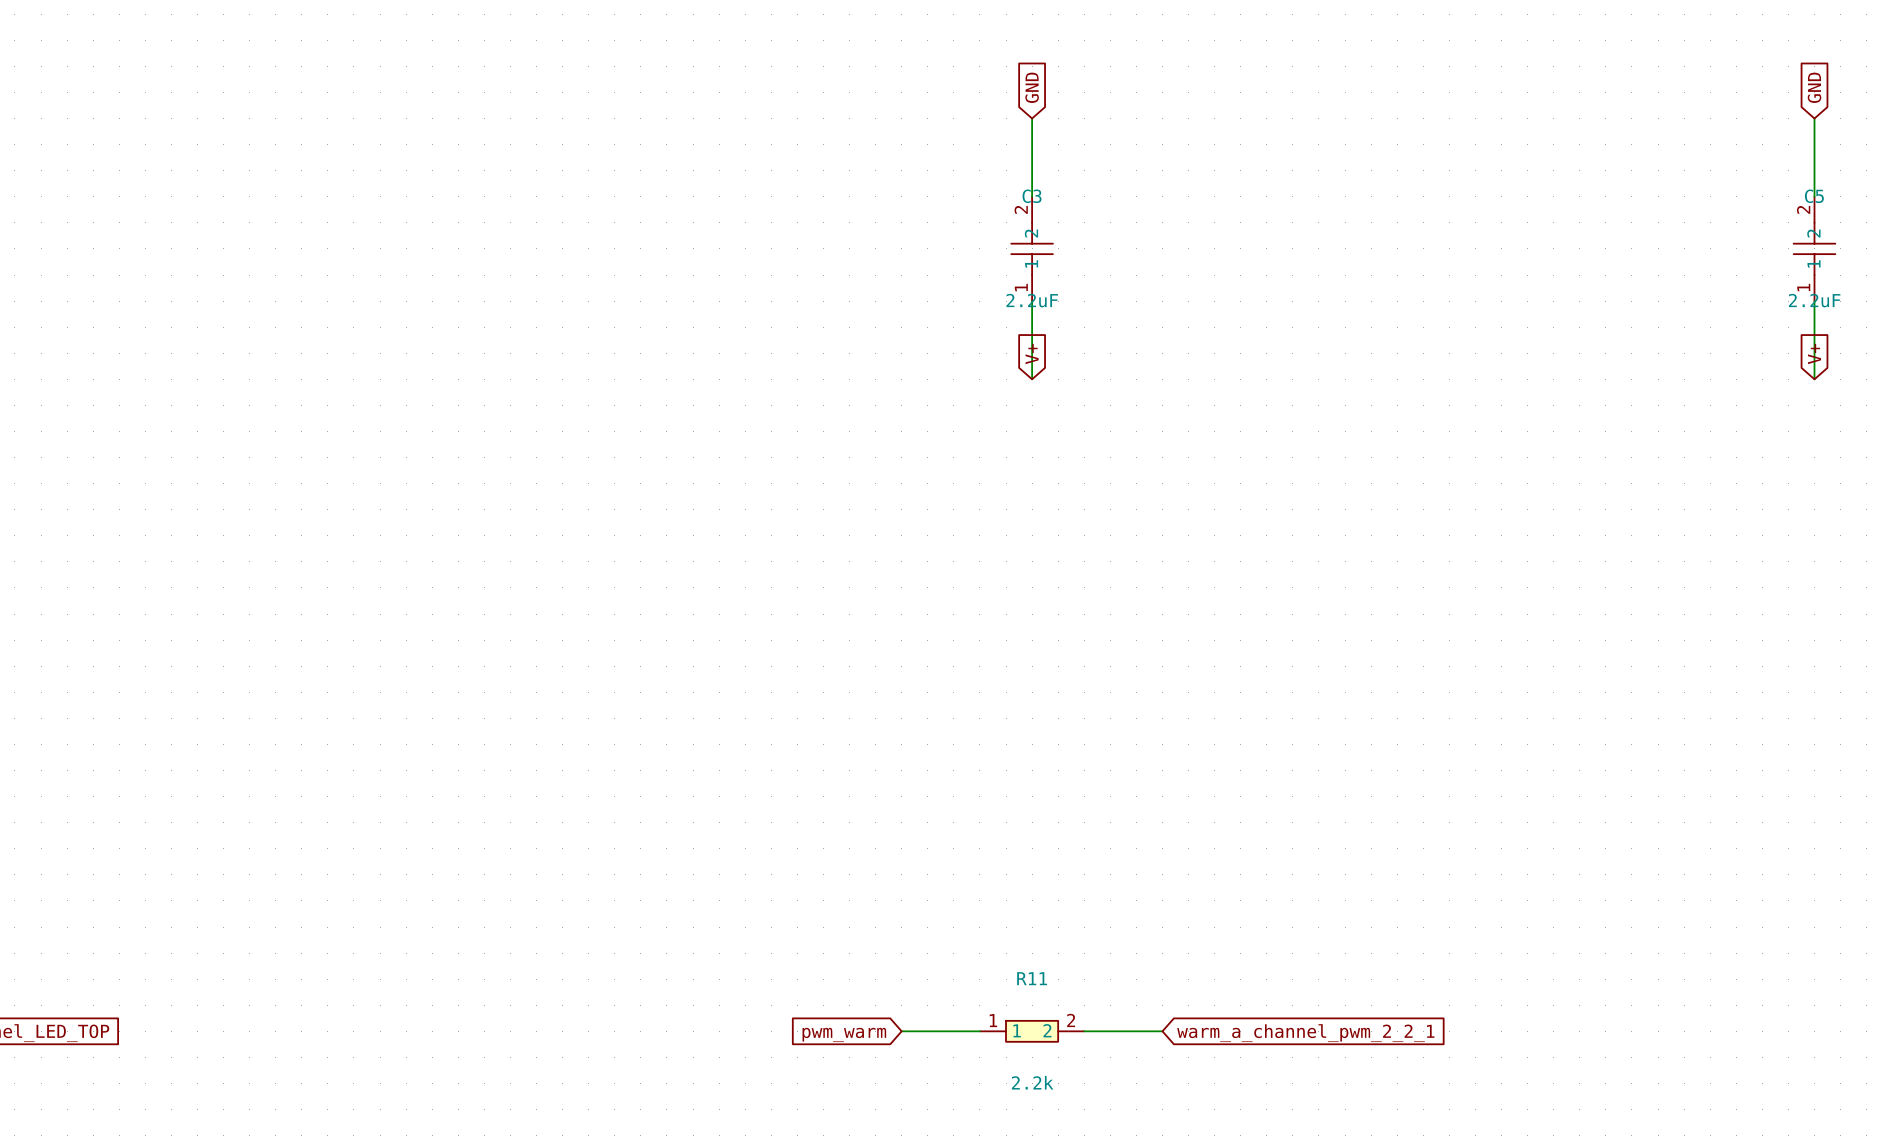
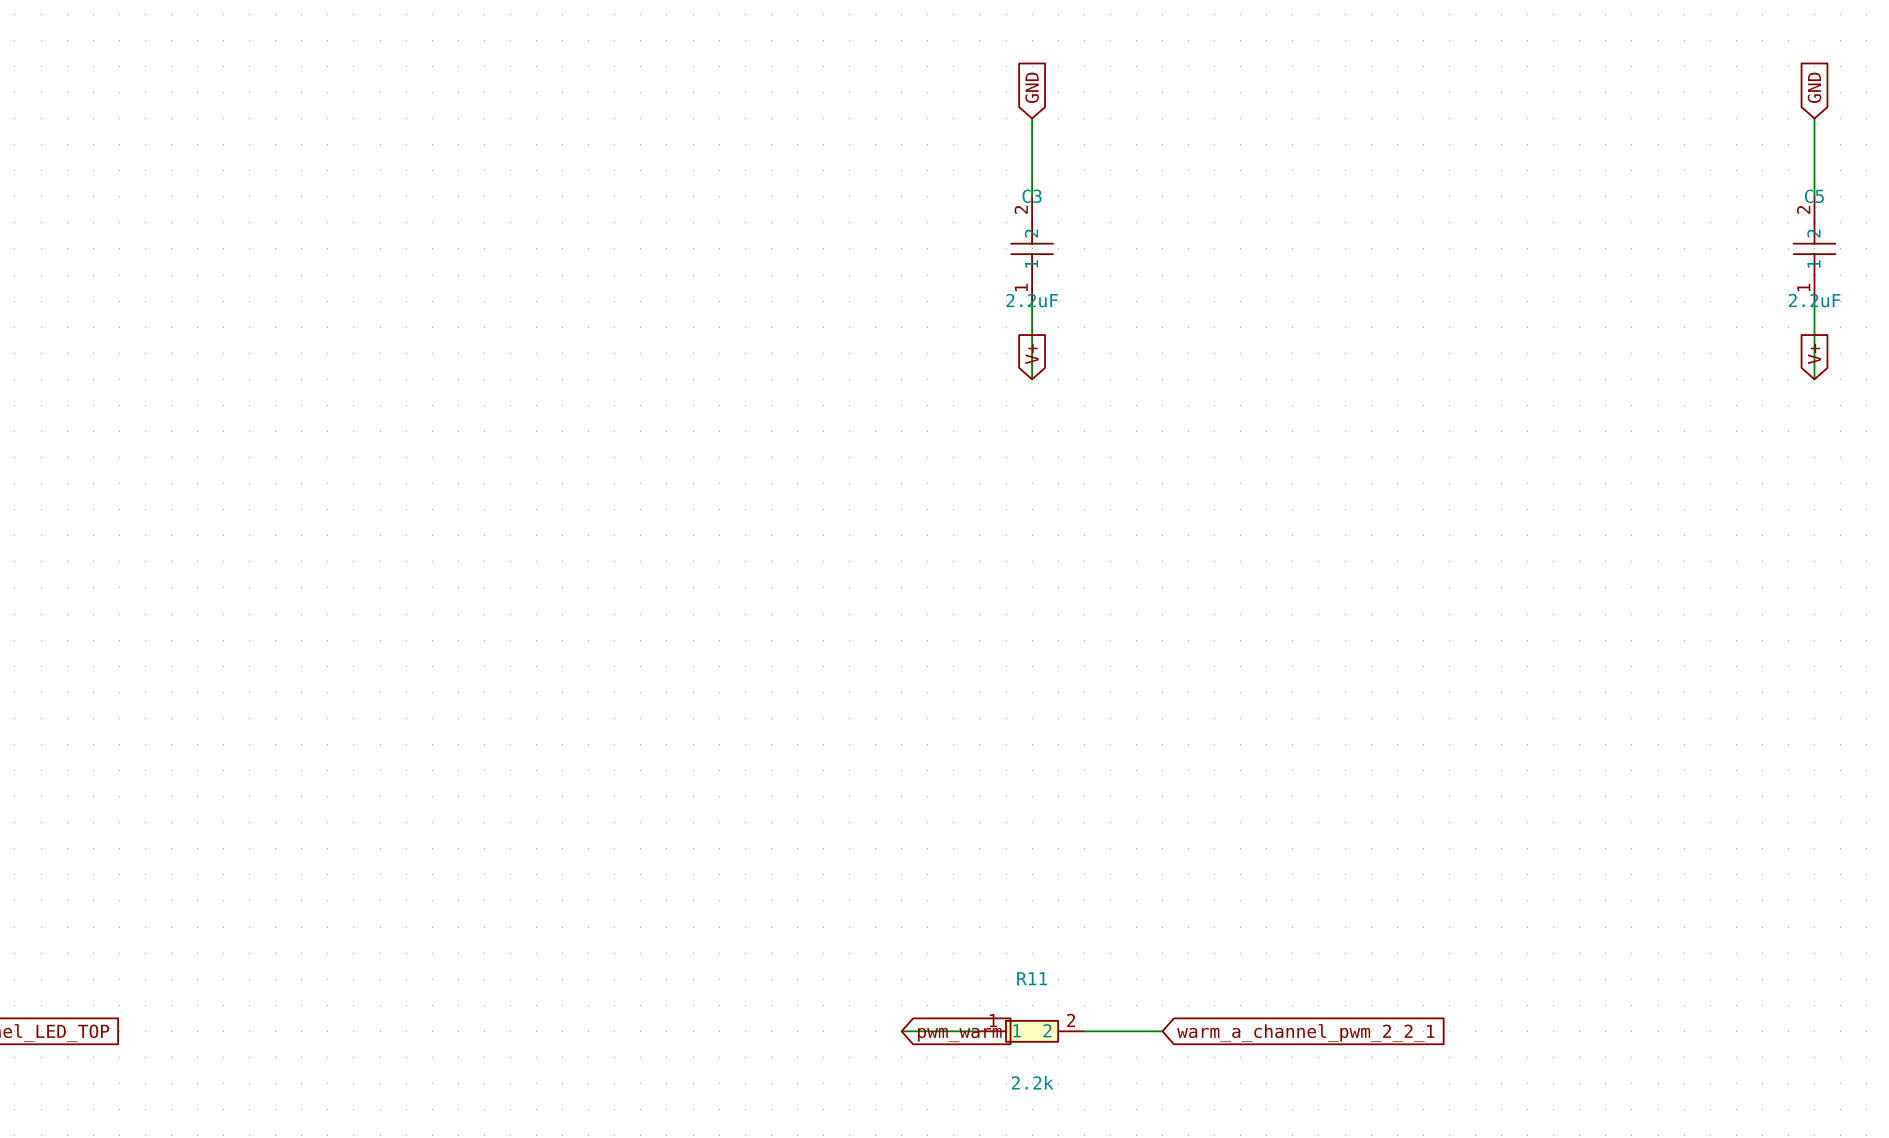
global label rotation: 0° (844, 1034) -> 180° (959, 1034)
global label position: pwm_warm (844, 1034) -> pwm_warm (959, 1034)

